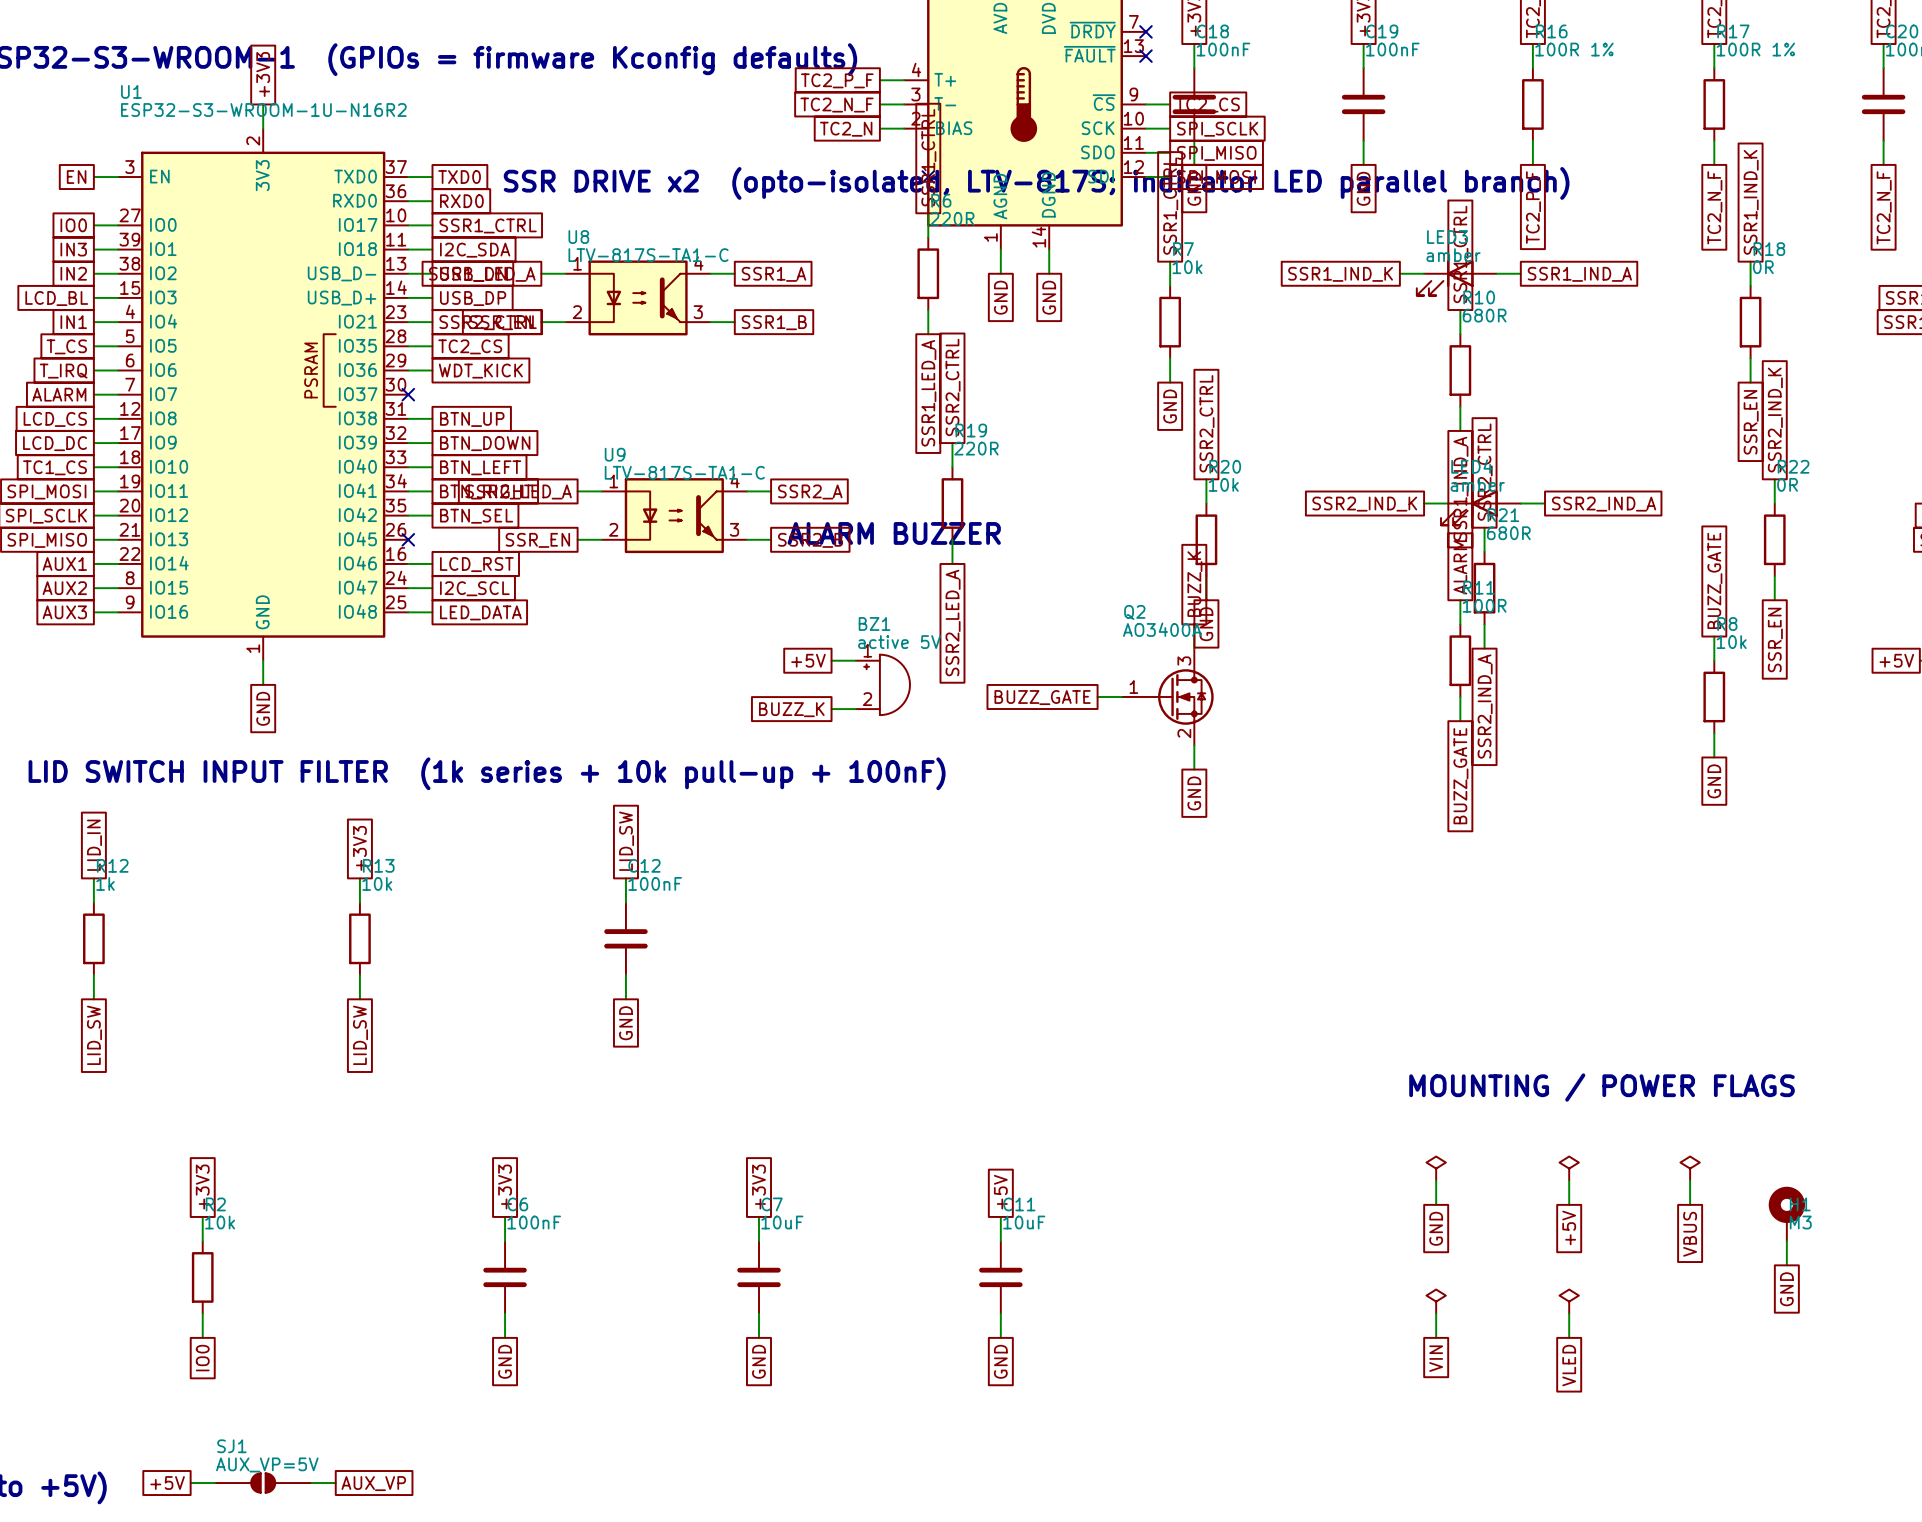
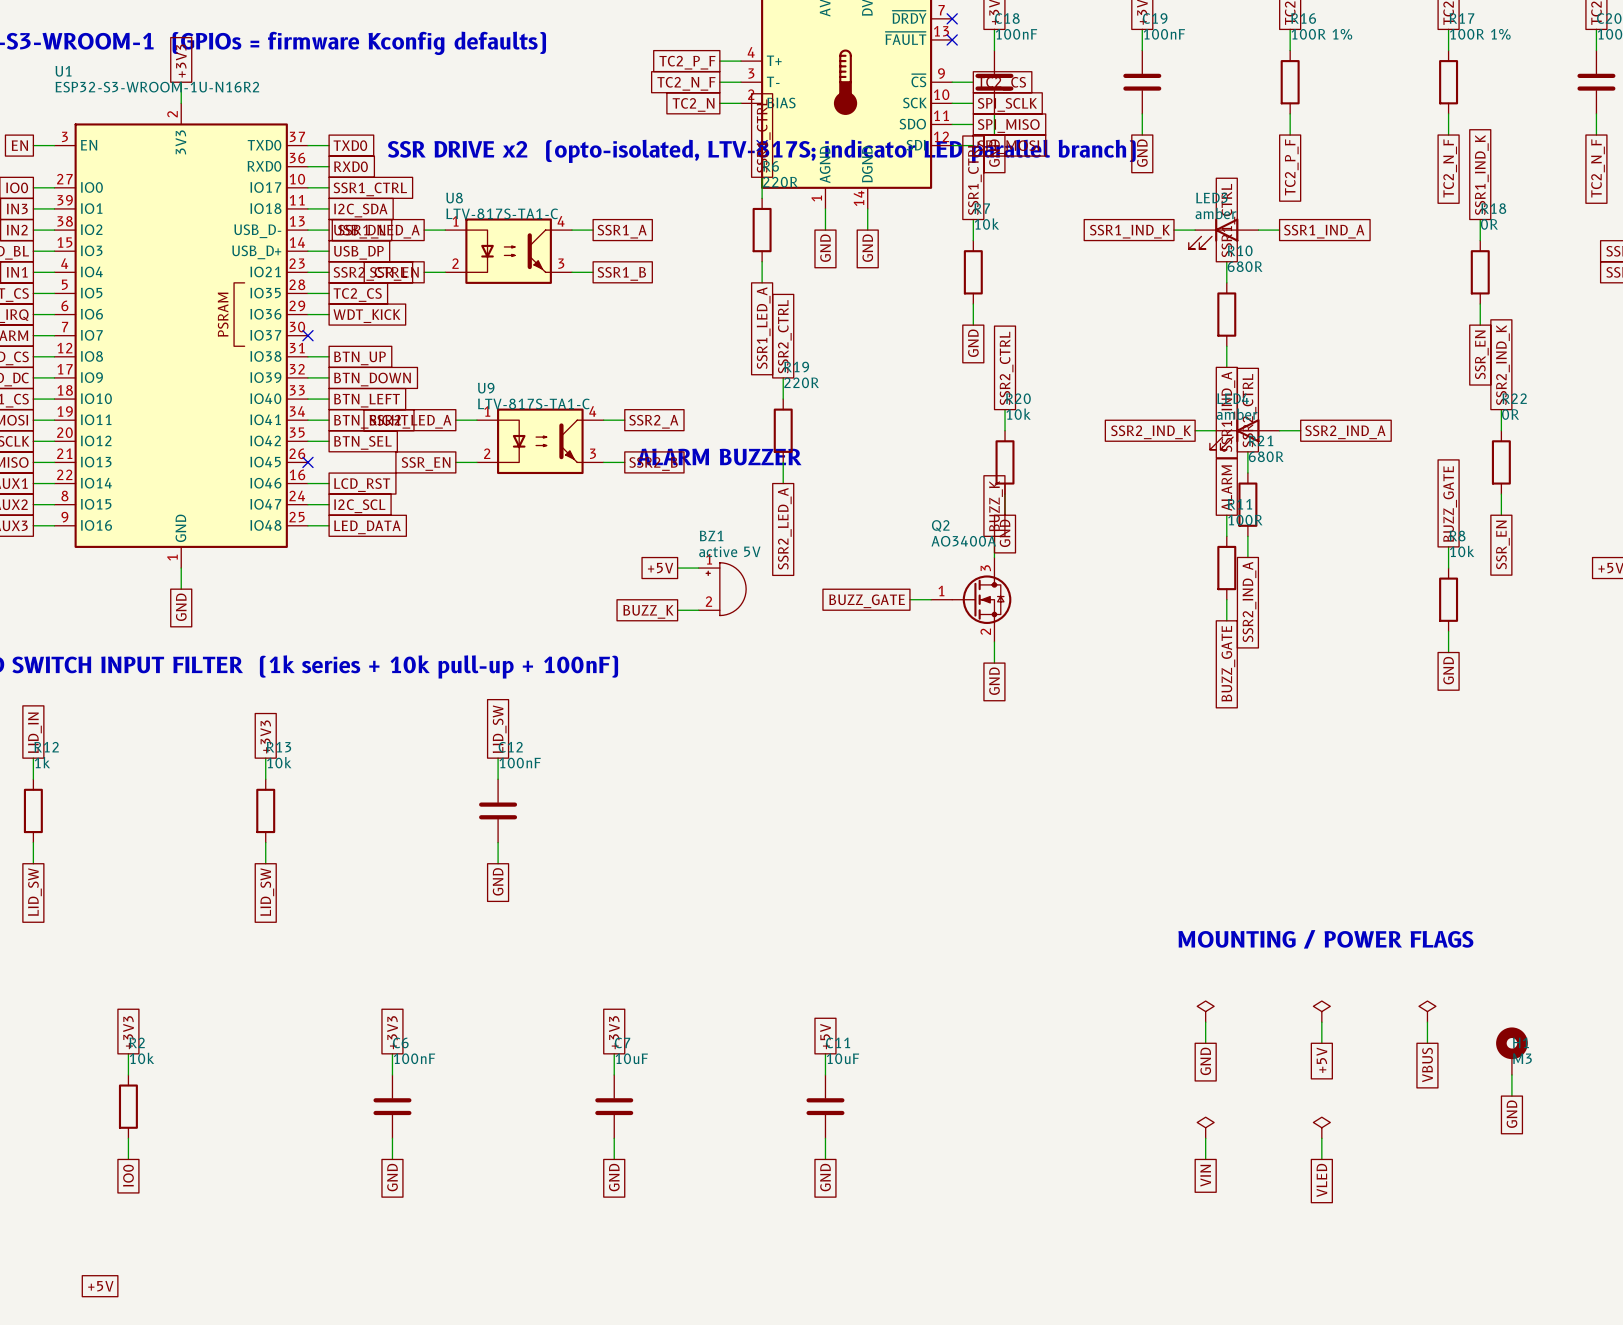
wire: (190, 1483) (214, 1483) -> none
SJ1: AUX_VP=5V (263, 1483) -> none
wire: (311, 1483) (335, 1483) -> none
global label: AUX_VP (373, 1483) -> none

